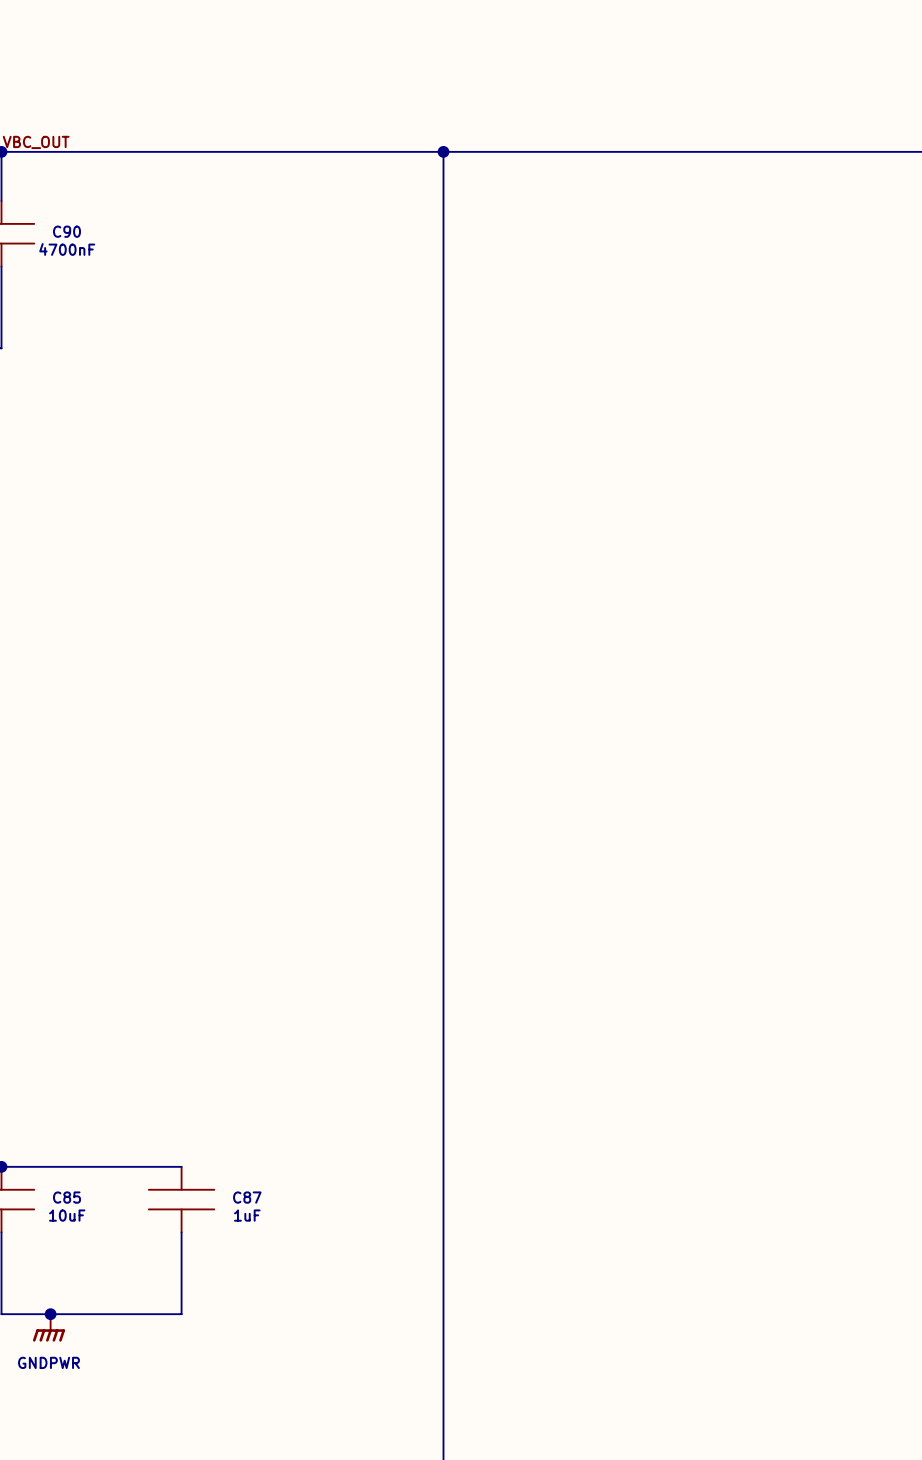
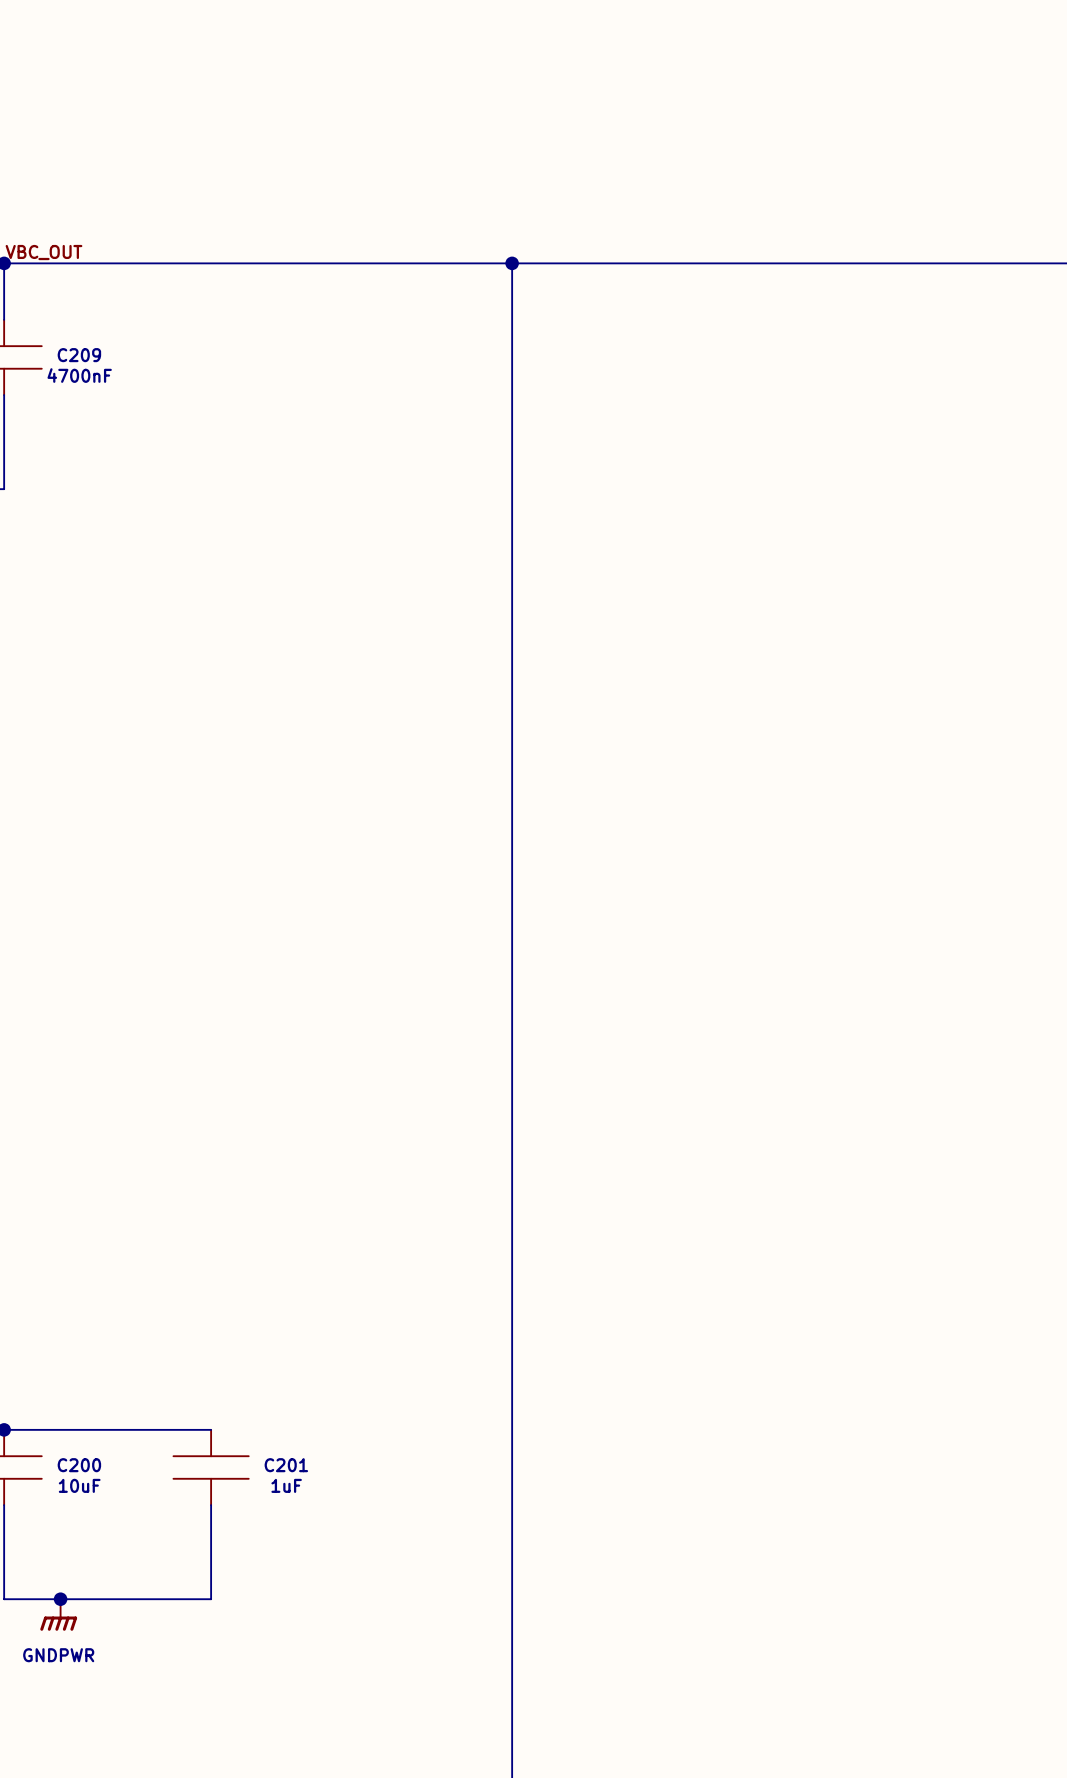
C90 name: C90 (66, 231) -> C209 (79, 355)
C85 name: C85 (66, 1197) -> C200 (79, 1465)
C87 name: C87 (247, 1197) -> C201 (286, 1465)

